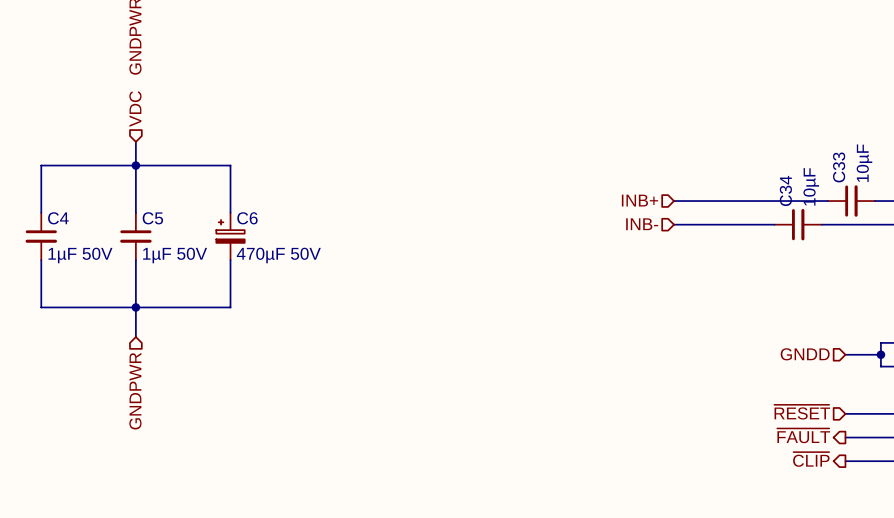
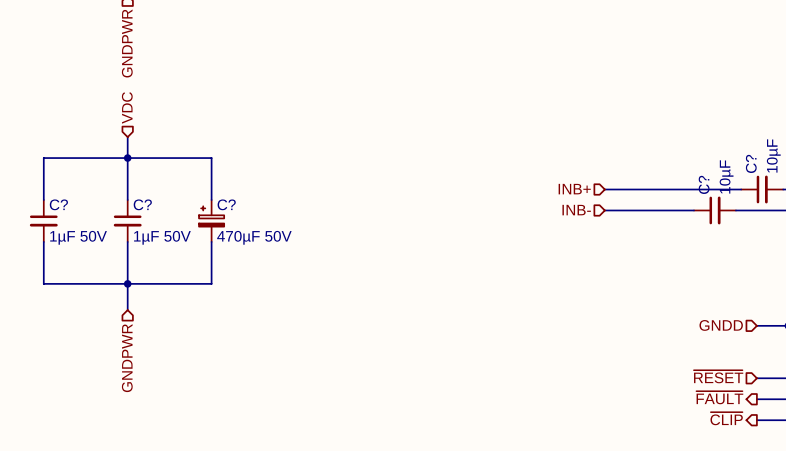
C33 name: C33 (839, 167) -> C? (751, 163)
C34 name: C34 (785, 190) -> C? (704, 184)
C4 name: C4 (58, 218) -> C? (58, 204)
C5 name: C5 (152, 218) -> C? (142, 204)
C6 name: C6 (247, 218) -> C? (226, 204)

